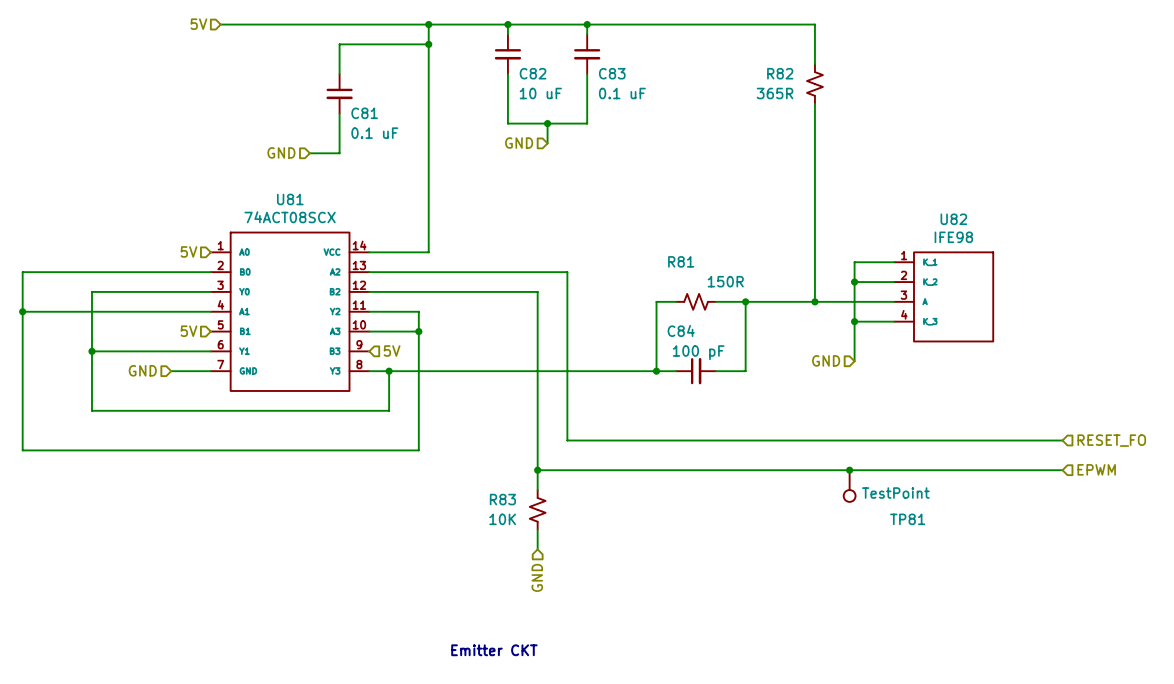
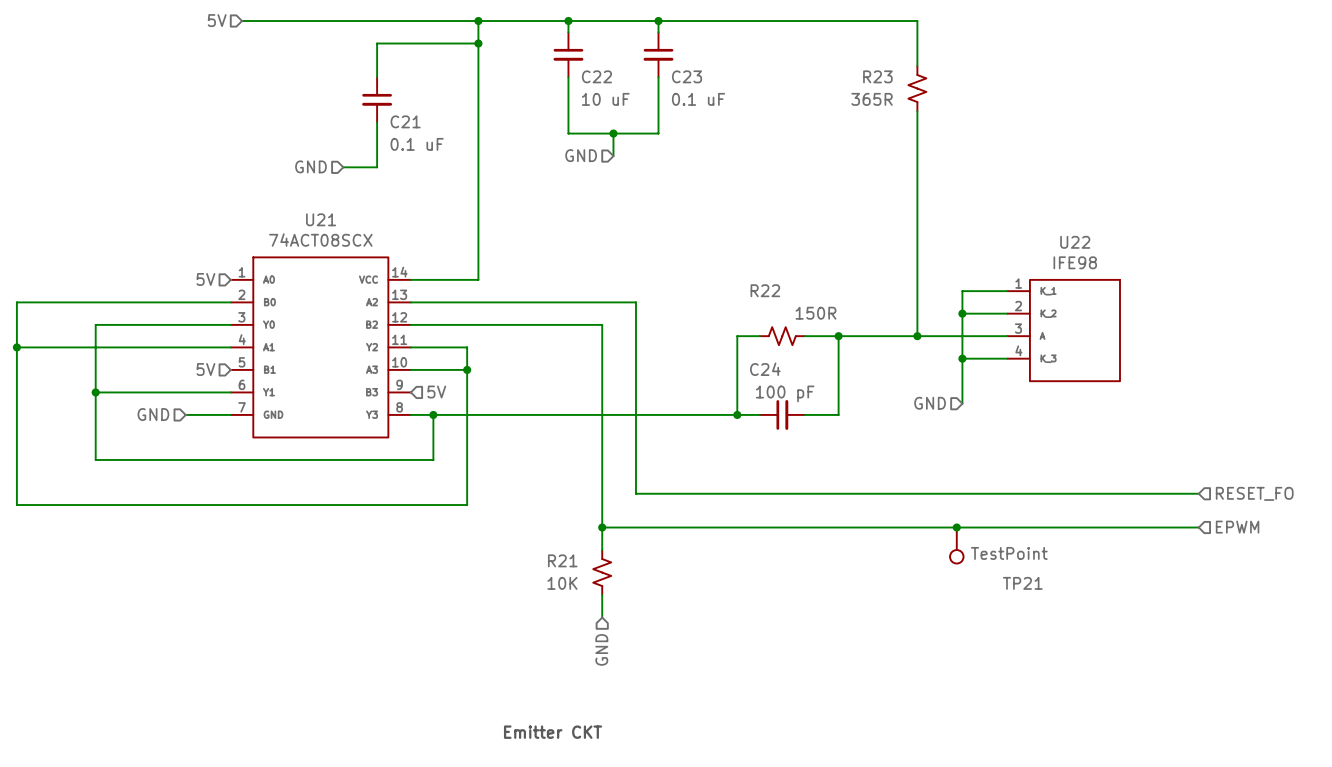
C82 name: C82 (533, 73) -> C22 (596, 76)
C83 name: C83 (612, 73) -> C23 (686, 76)
R82 name: R82 (780, 73) -> R23 (877, 76)
C81 name: C81 (364, 113) -> C21 (405, 121)
U81 name: U81 (290, 199) -> U21 (321, 219)
U82 name: U82 (953, 219) -> U22 (1075, 242)
R81 name: R81 (681, 261) -> R22 (765, 290)
C84 name: C84 (681, 330) -> C24 (765, 369)
R83 name: R83 (502, 499) -> R21 (562, 560)
TP81 name: TP81 (907, 519) -> TP21 (1022, 583)

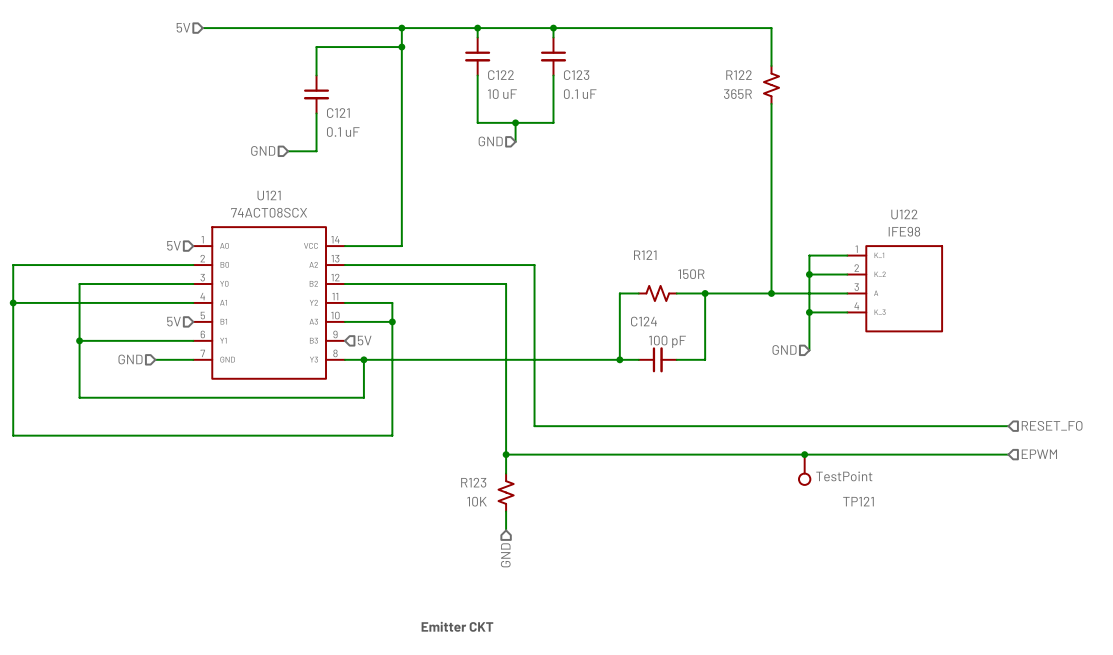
C22 name: C22 (596, 76) -> C122 (500, 75)
C23 name: C23 (686, 76) -> C123 (576, 75)
R23 name: R23 (877, 76) -> R122 (739, 75)
C21 name: C21 (405, 121) -> C121 (338, 113)
U21 name: U21 (321, 219) -> U121 (269, 195)
U22 name: U22 (1075, 242) -> U122 (904, 214)
R22 name: R22 (765, 290) -> R121 (645, 255)
C24 name: C24 (765, 369) -> C124 (643, 321)
R21 name: R21 (562, 560) -> R123 (473, 482)
TP21 name: TP21 (1022, 583) -> TP121 (858, 501)

